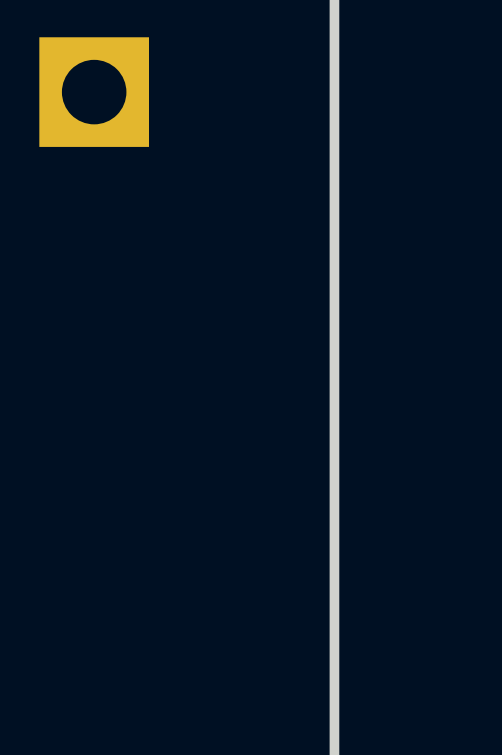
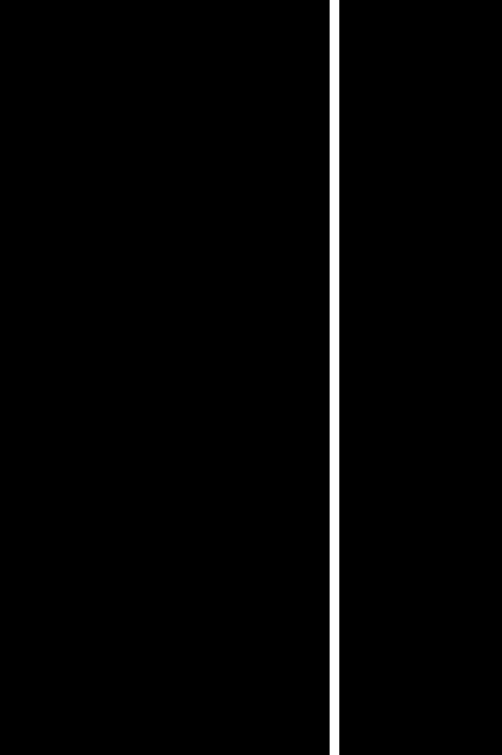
part: (94, 92) -> none

